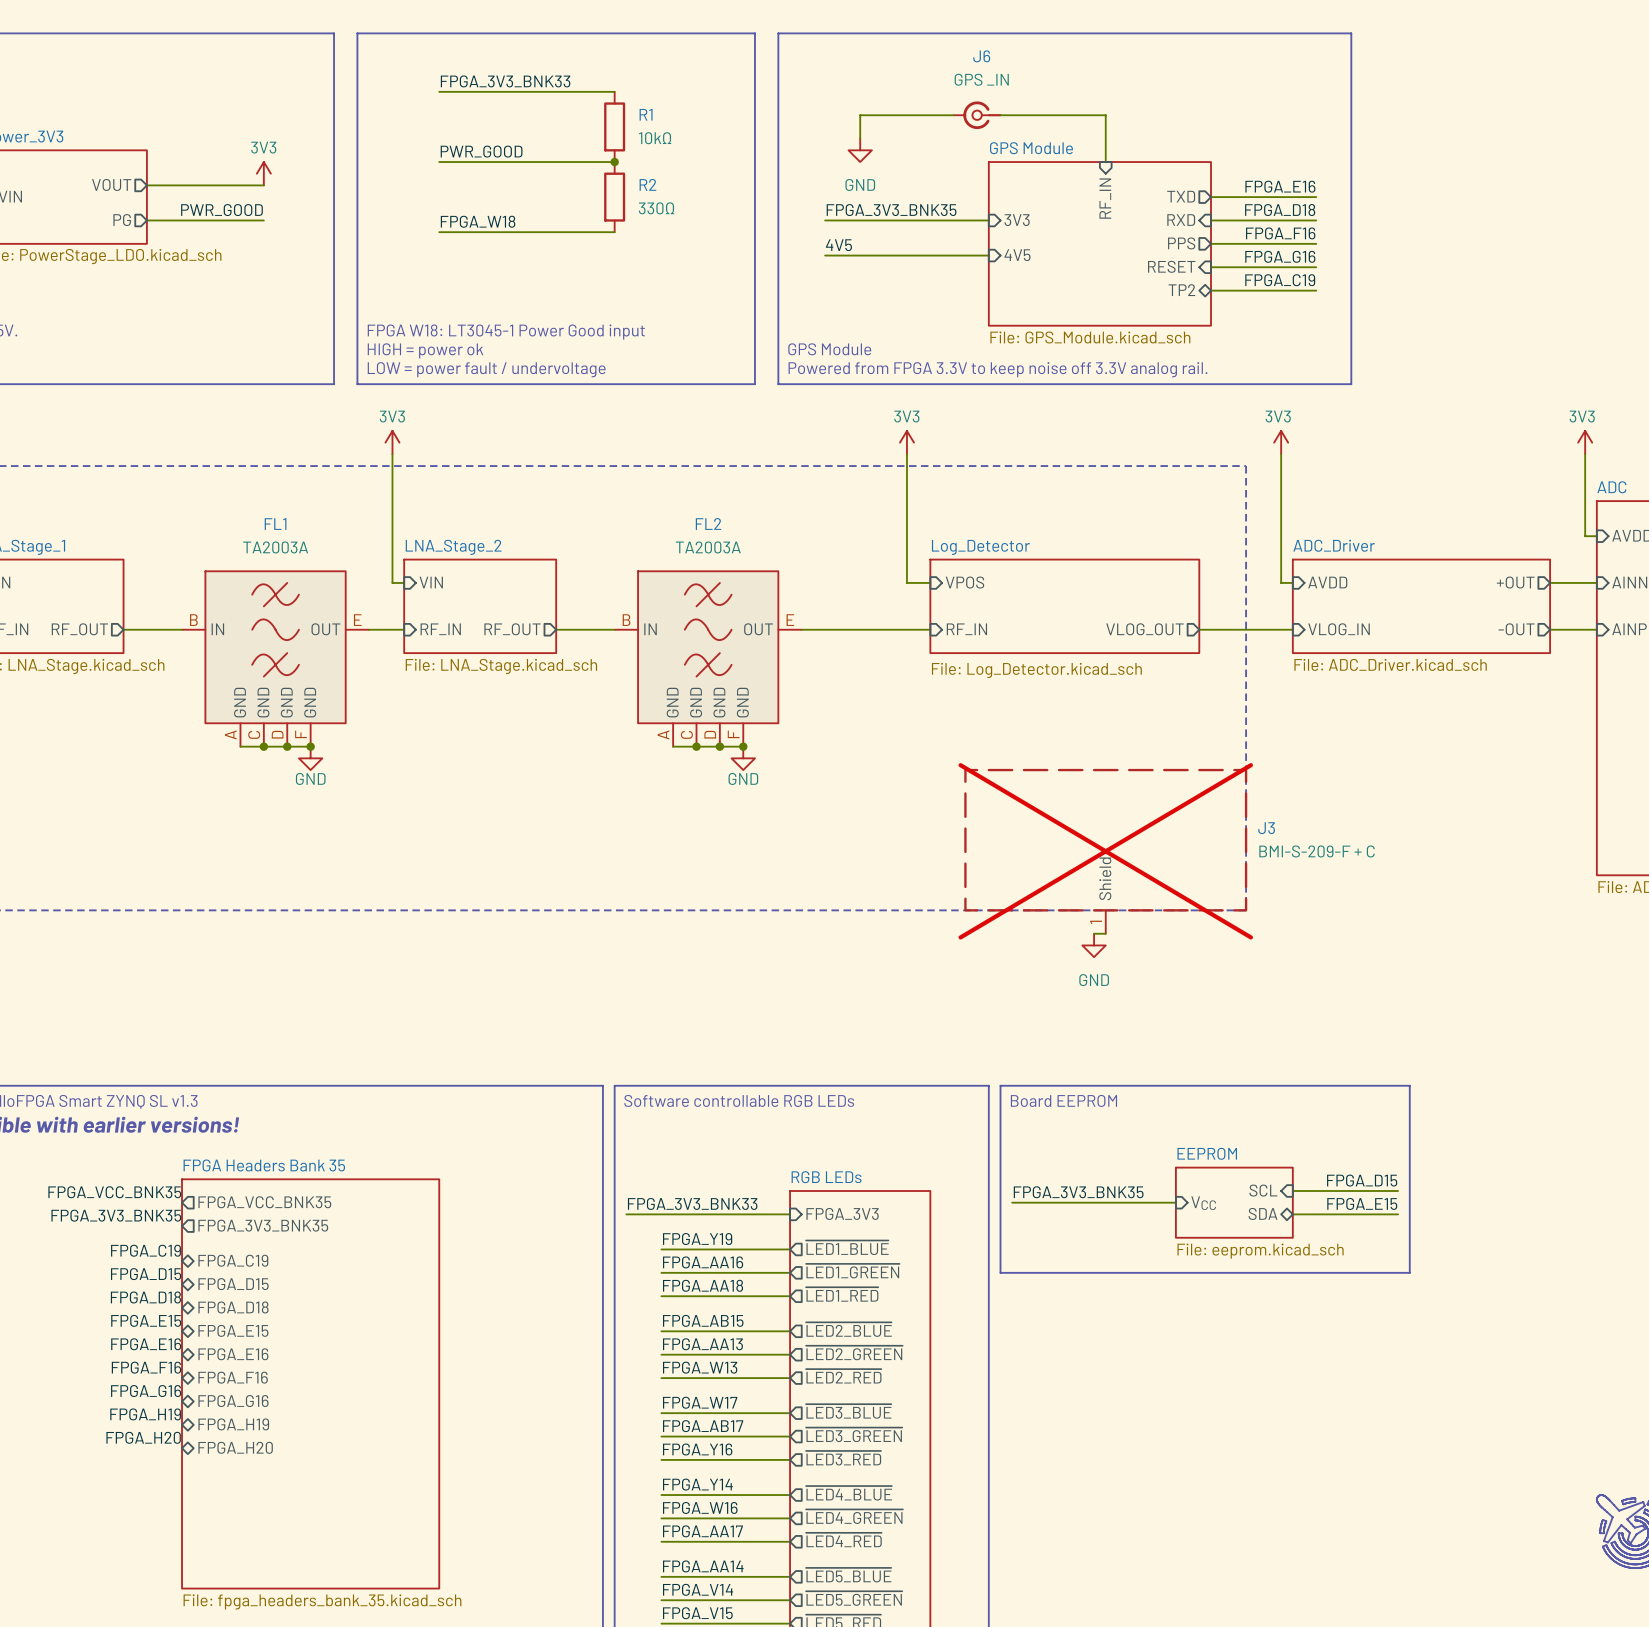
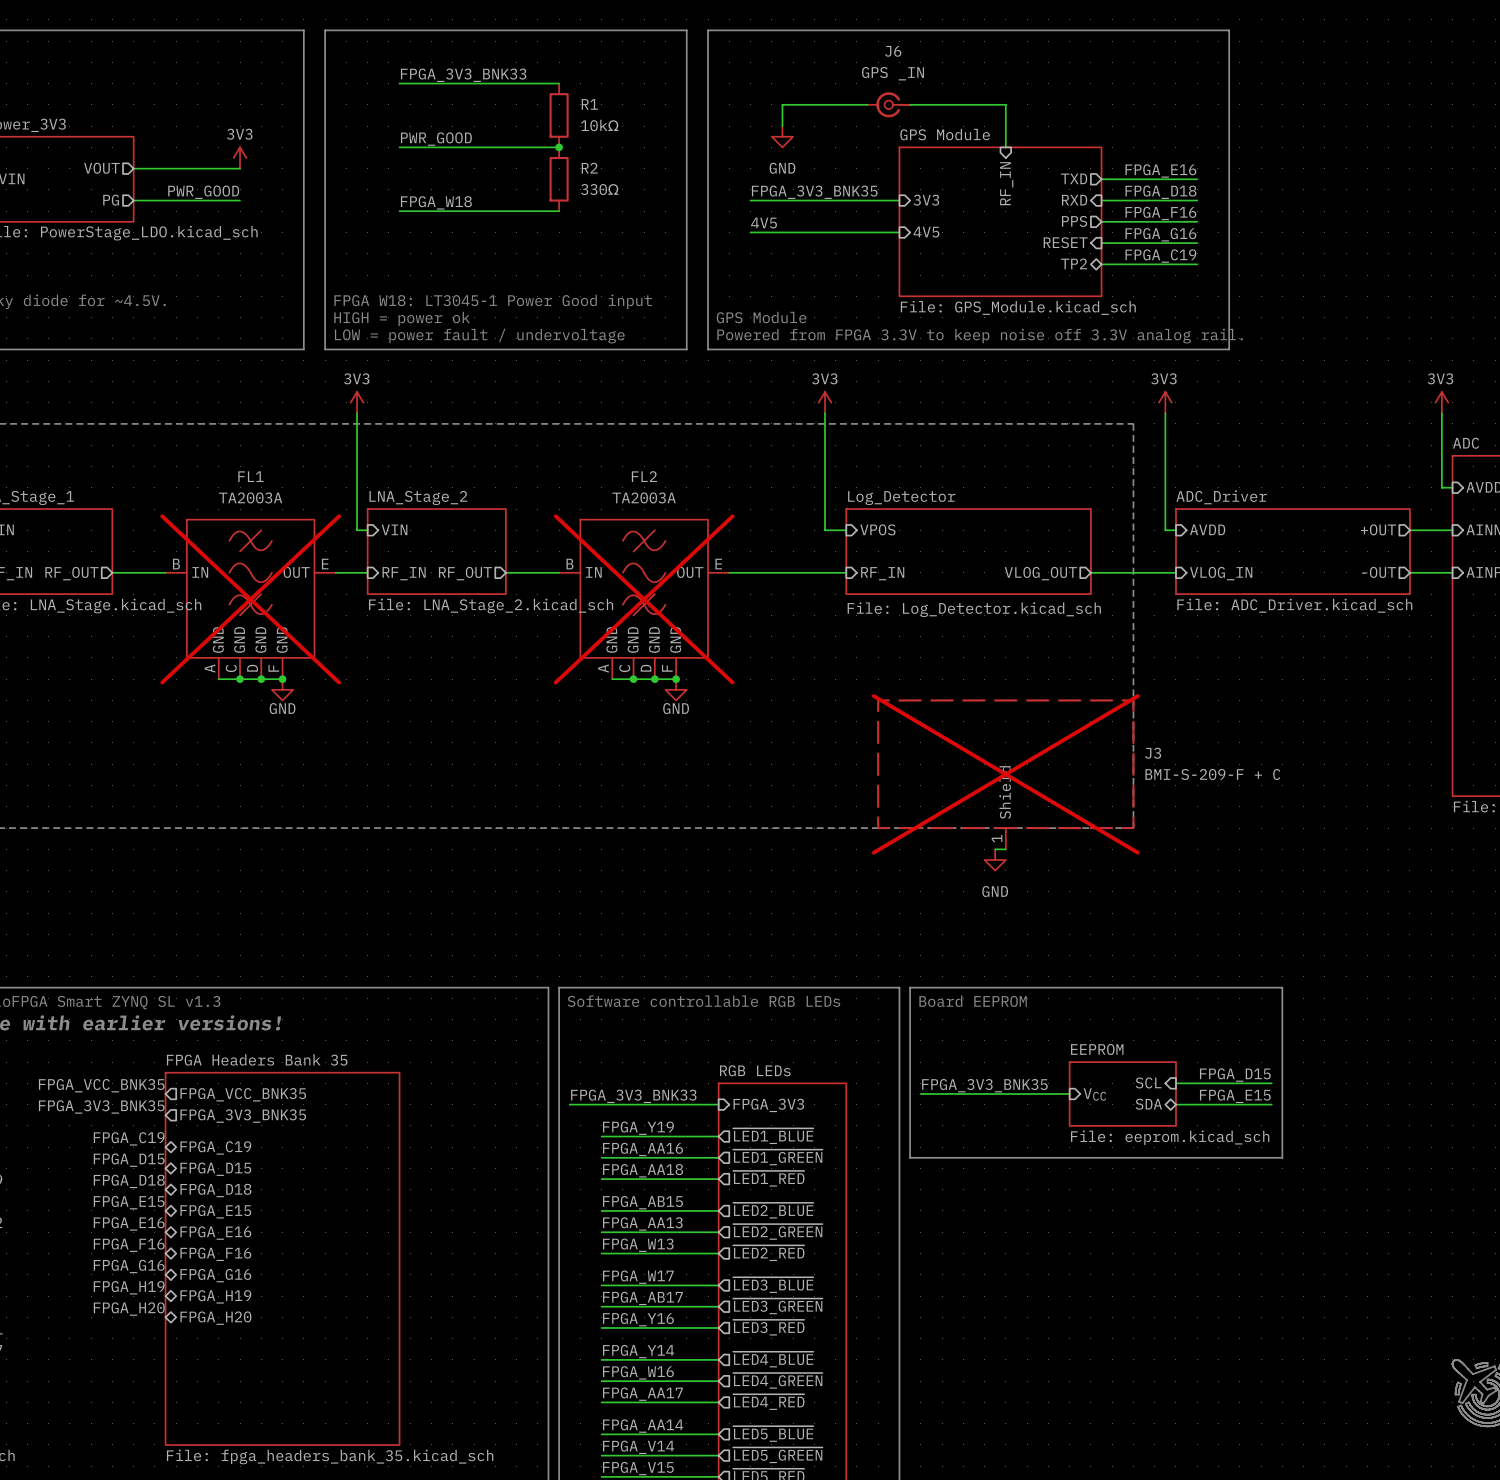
FL1 do-not-place cross: none -> (250, 599)
FL2 do-not-place cross: none -> (644, 599)
sheet LNA_Stage_2 value: File: LNA_Stage.kicad_sch (501, 666) -> File: LNA_Stage_2.kicad_sch (491, 606)

